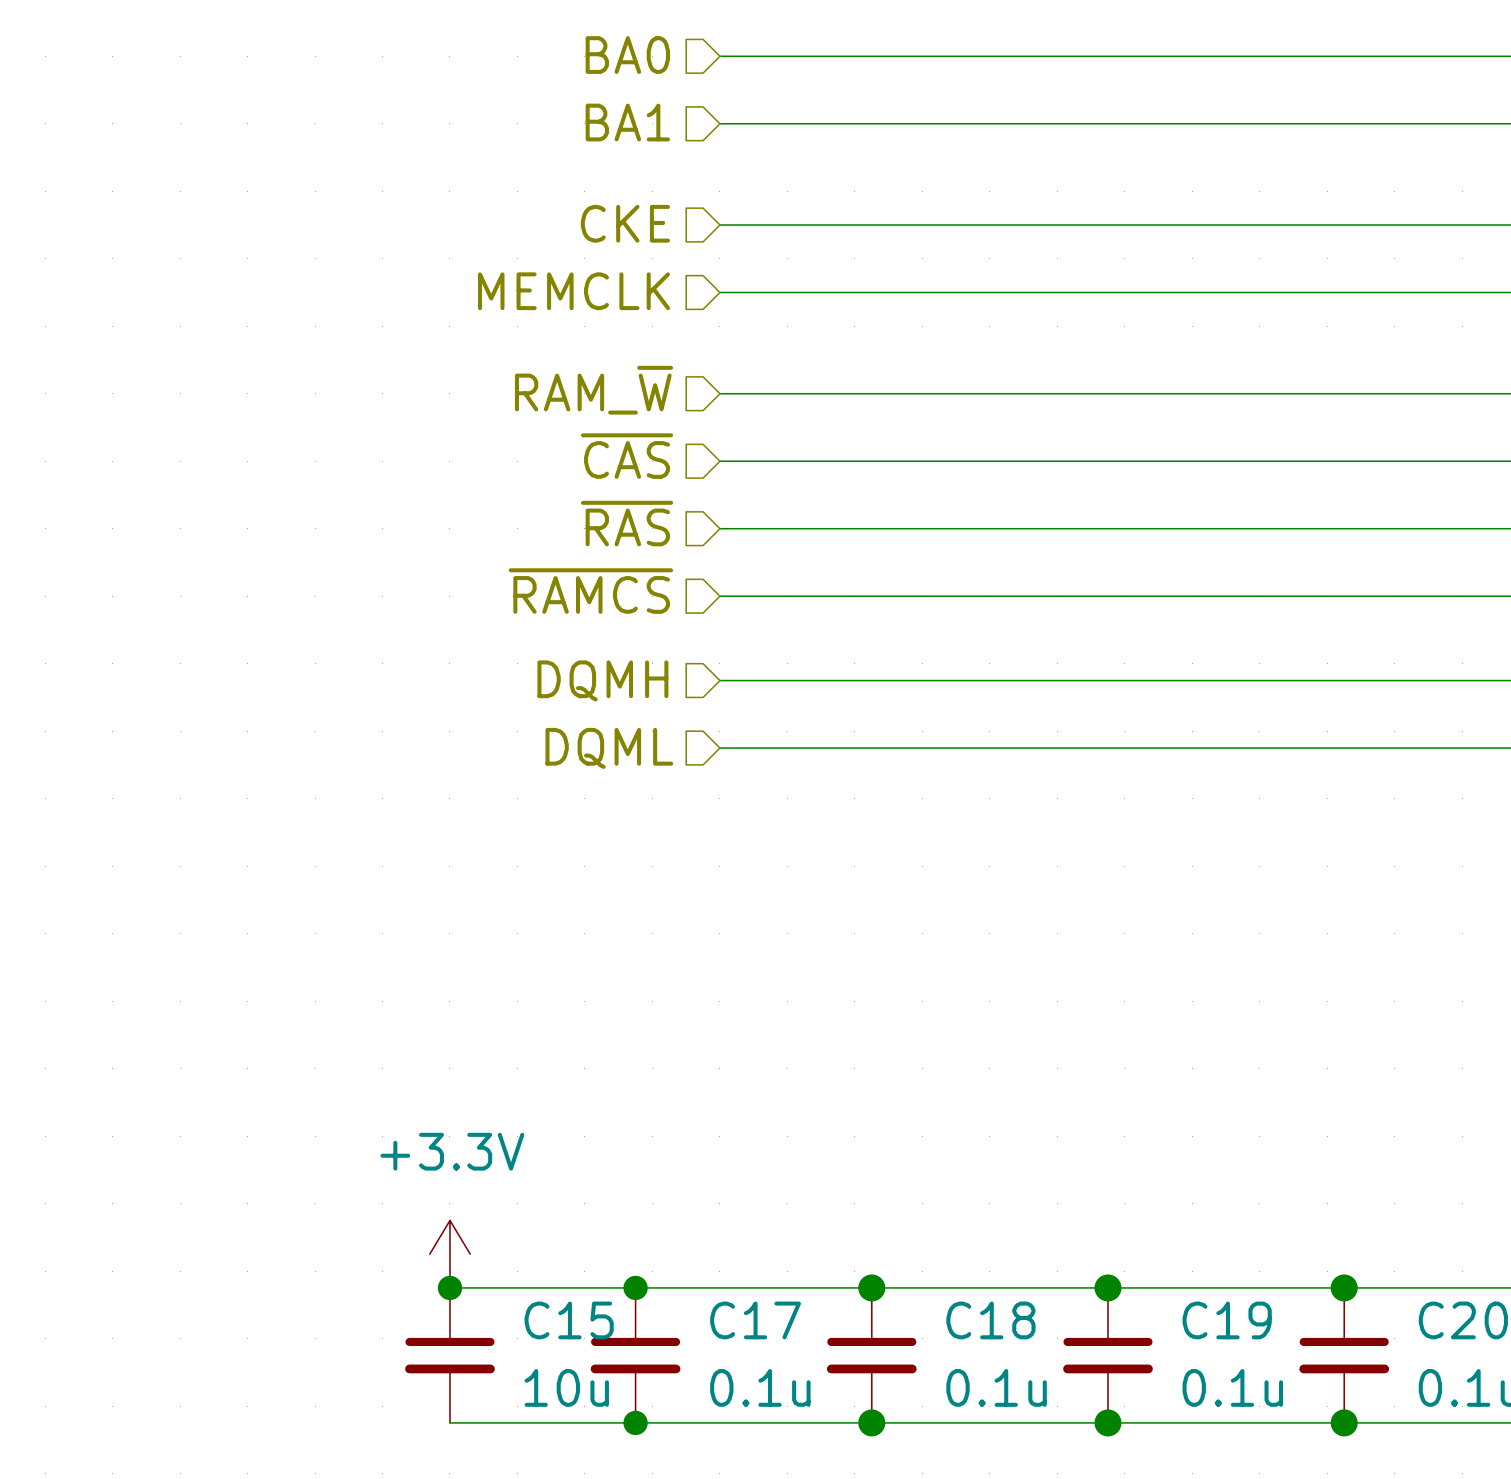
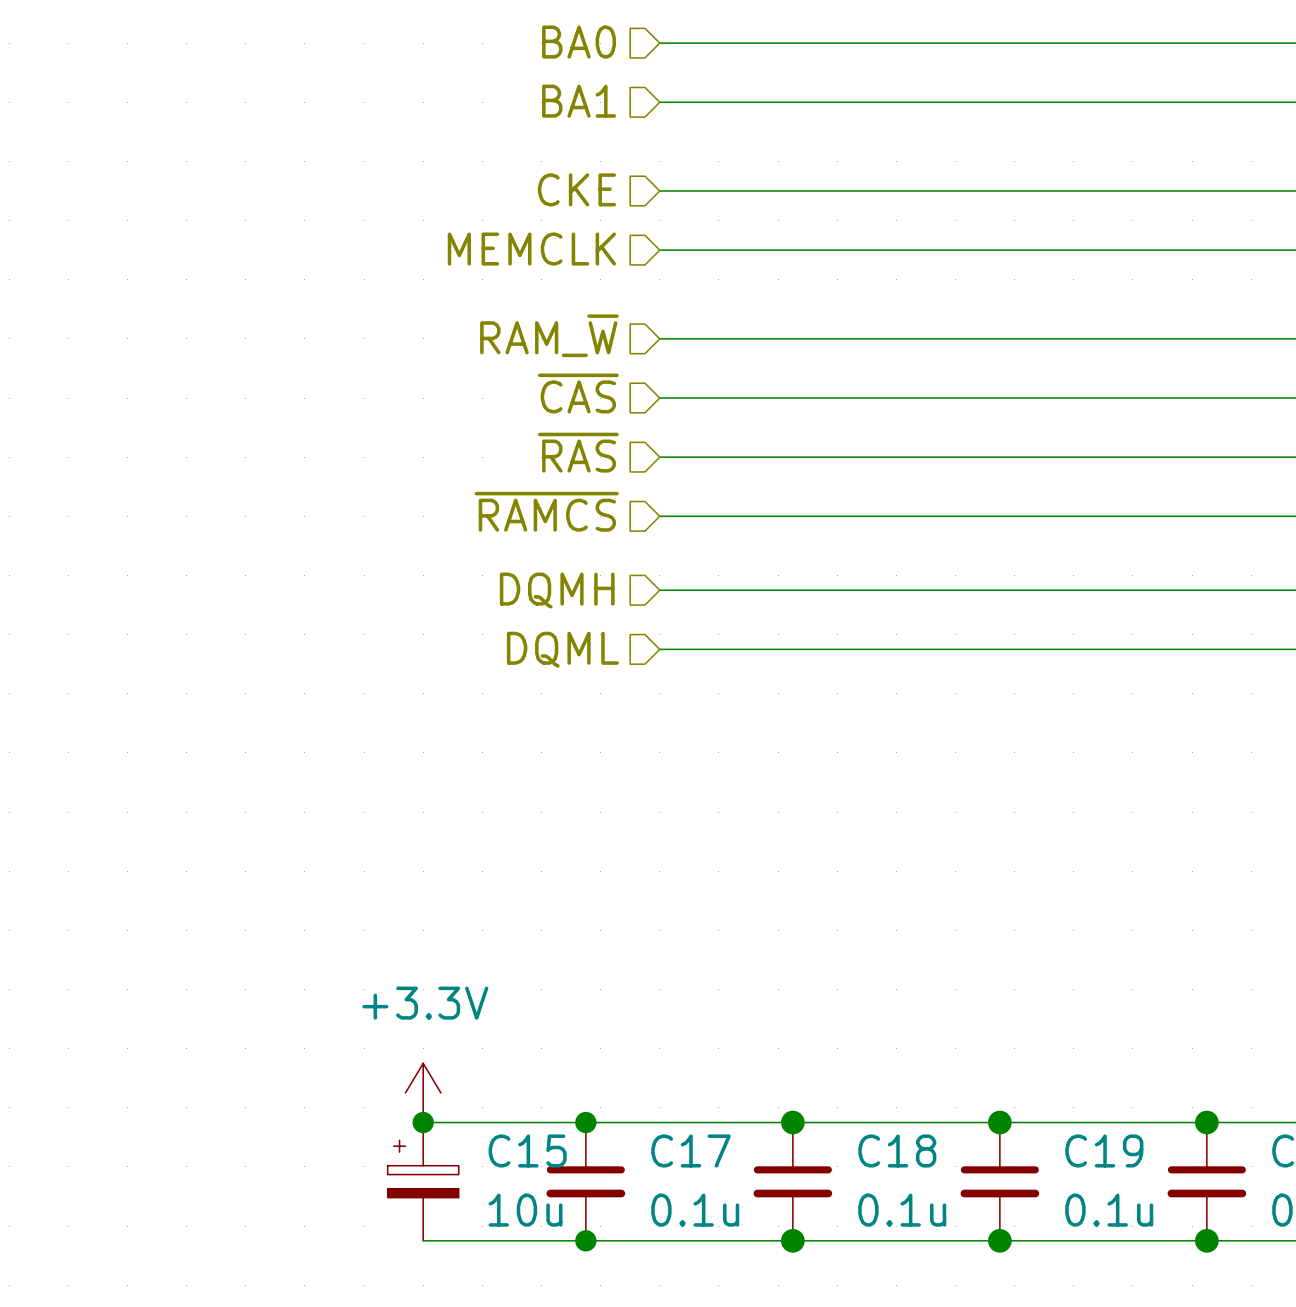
C15 symbol: [405, 1287, 495, 1423] -> [387, 1122, 459, 1241]

